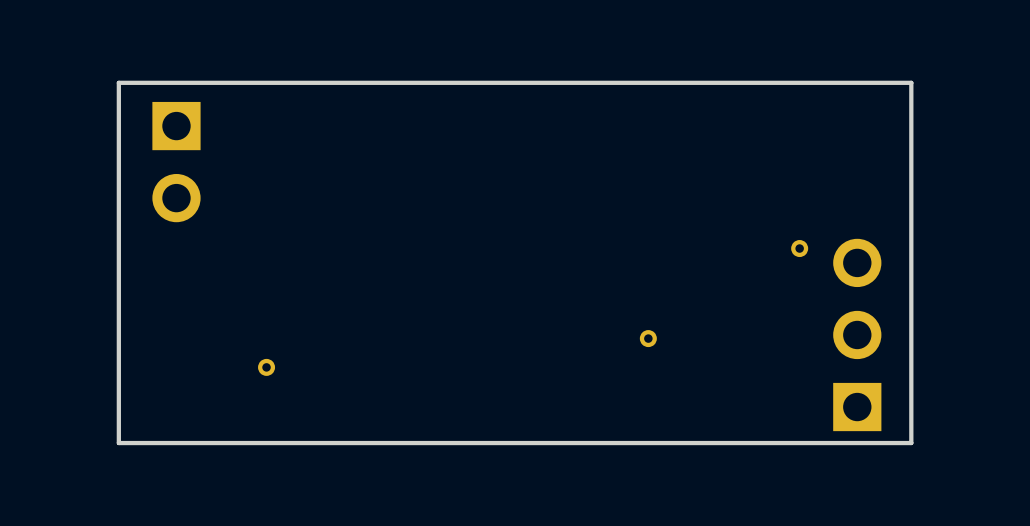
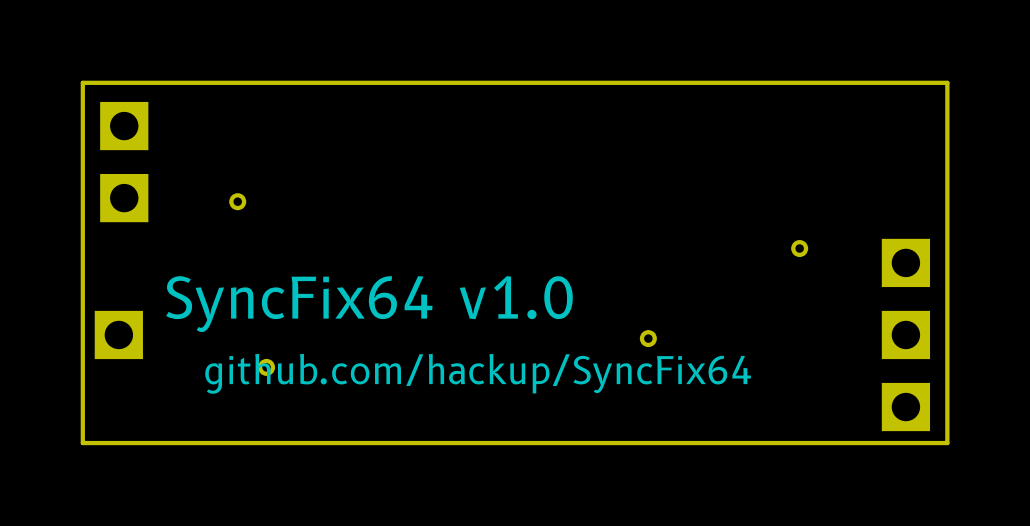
board edge: (118, 82) (118, 443) -> (118, 82) (82, 82) (82, 443) (118, 443)
board edge: (911, 82) (911, 443) -> (911, 82) (947, 82) (947, 443) (911, 443)
part: none -> (124, 162)
part: (176, 162) -> none
part: none -> (237, 201)
text: none -> SyncFix64 v1.0 (369, 304)
part: none -> (118, 334)
part: (857, 334) -> none
part: none -> (905, 334)
text: none -> github.com/hackup/SyncFix64 (478, 373)

